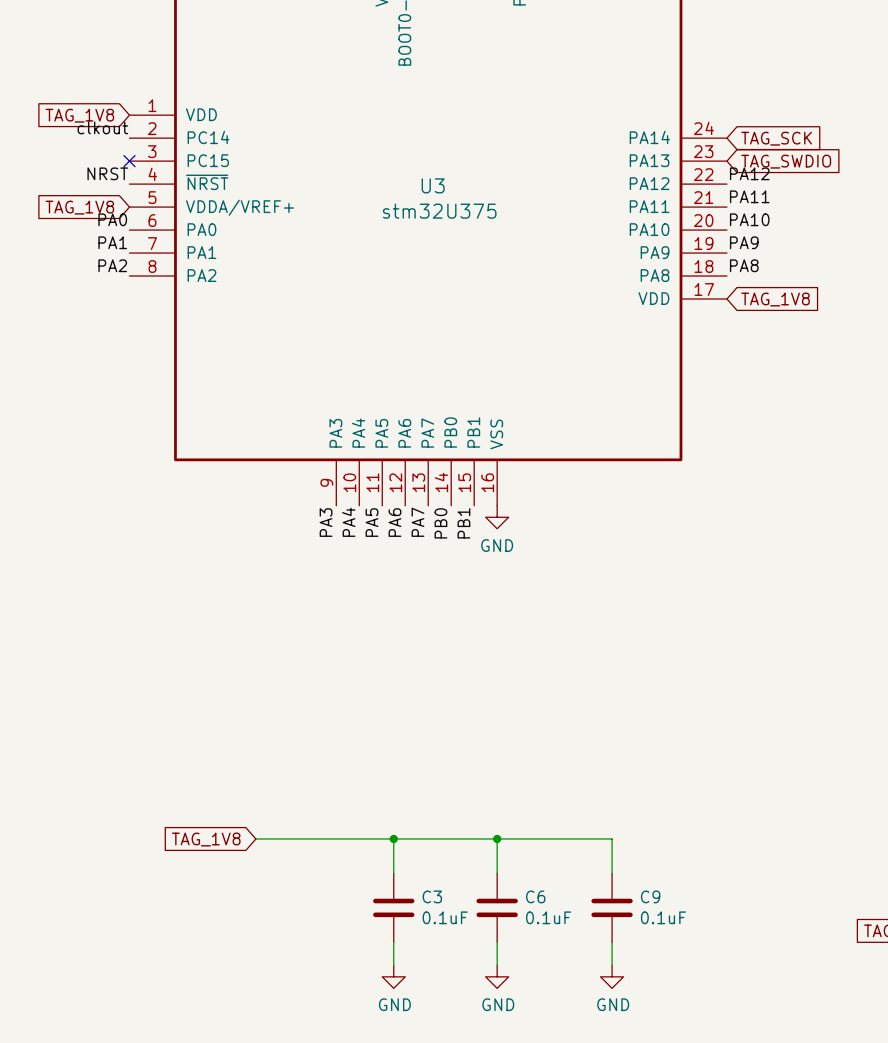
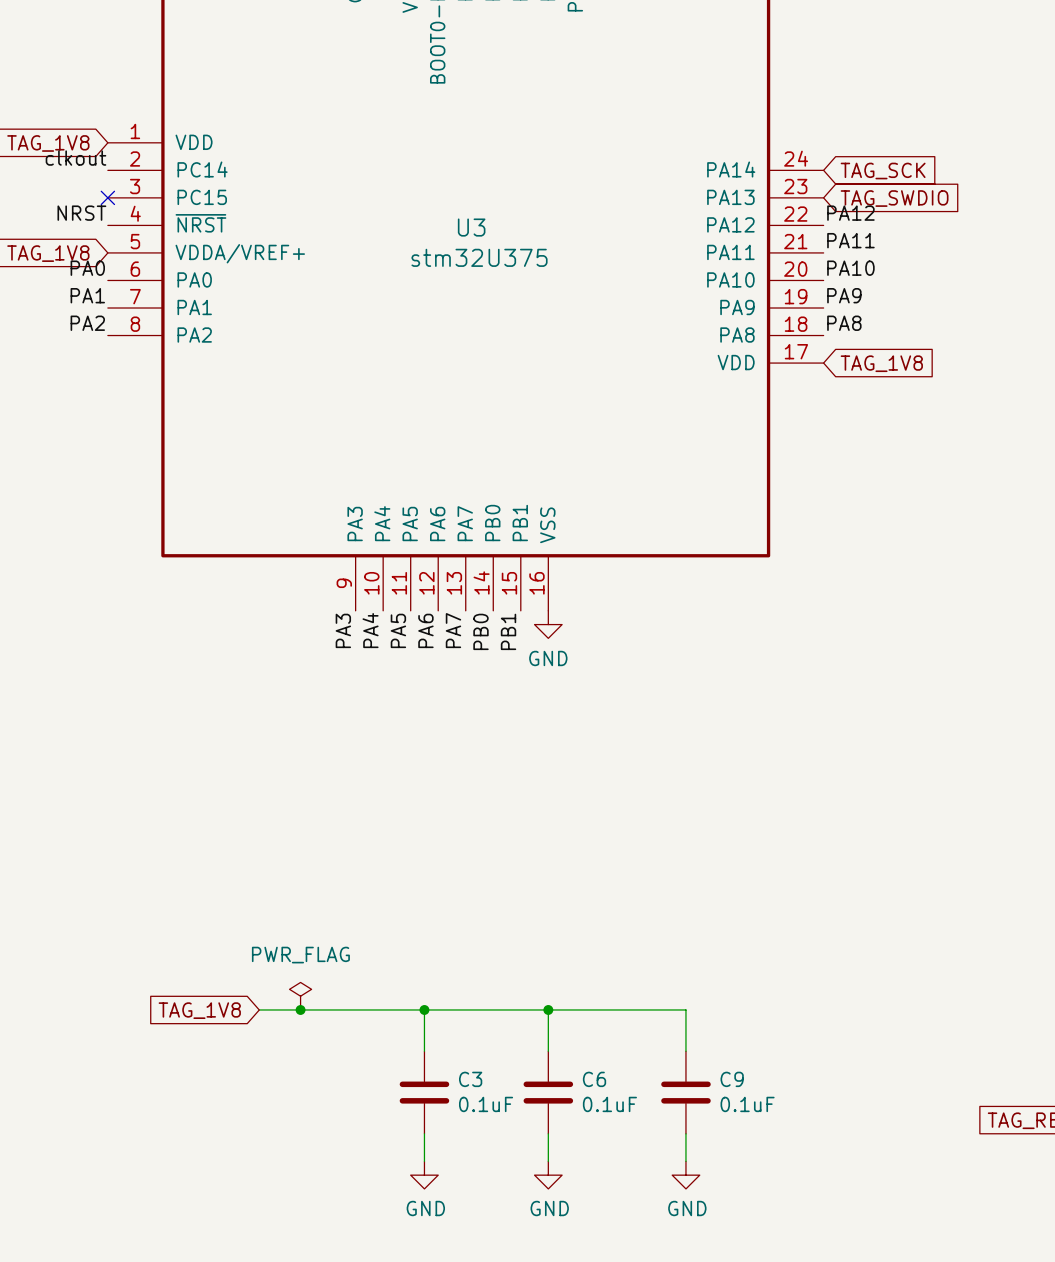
power symbol: none -> PWR_FLAG (300, 996)
junction: none -> (300, 1009)

